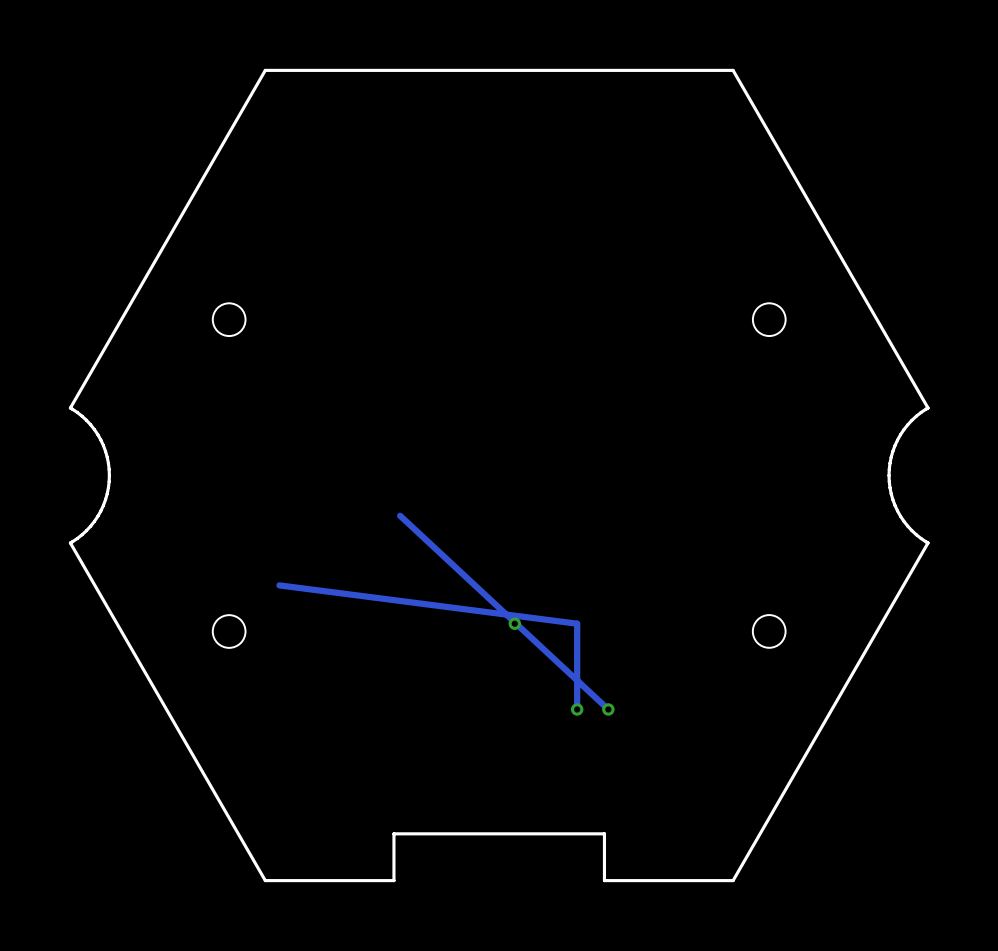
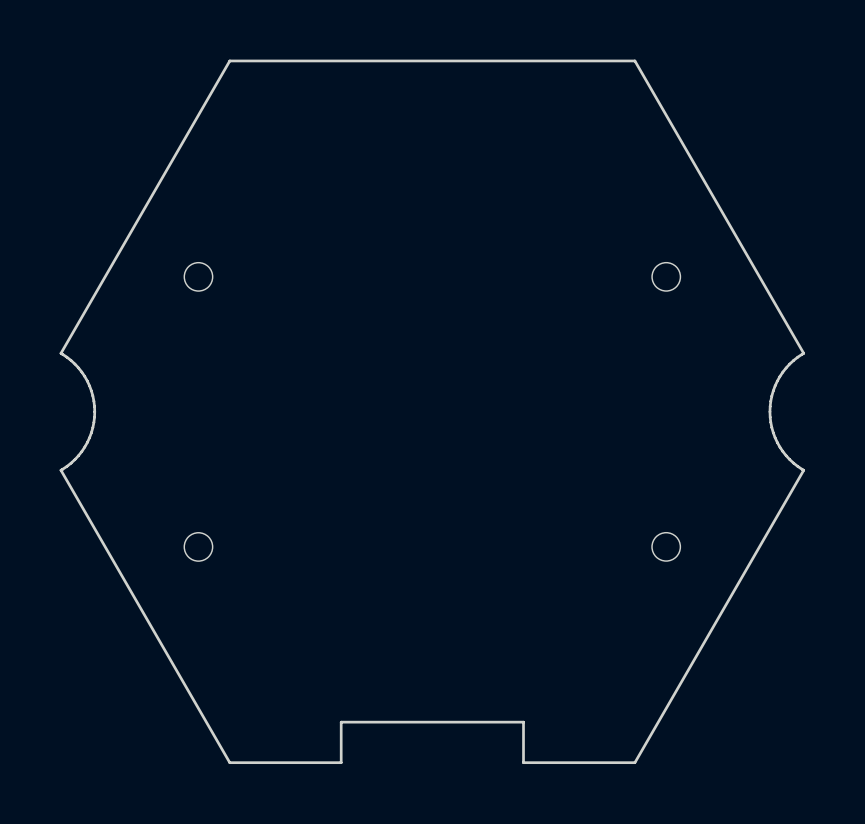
track: (400, 515) (608, 709) -> none
track: (279, 585) (577, 623) (577, 709) -> none
via: (514, 623) -> none
via: (577, 709) -> none
via: (608, 709) -> none

